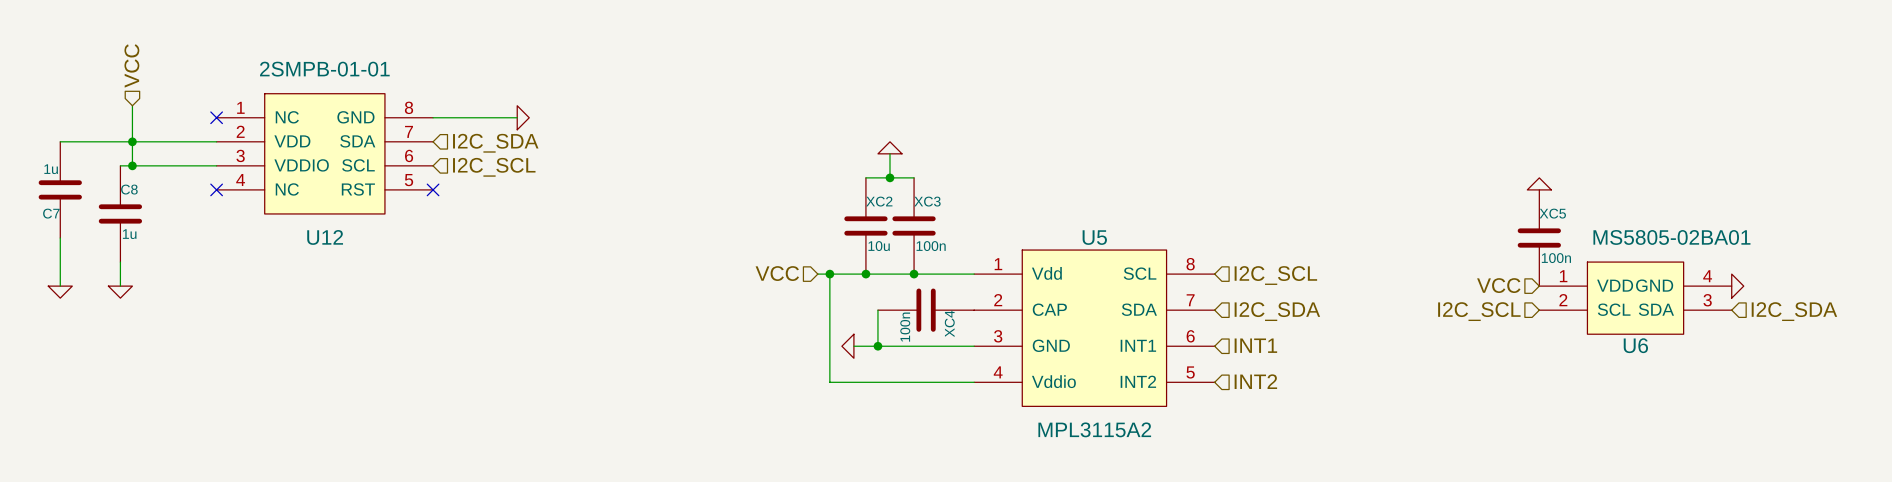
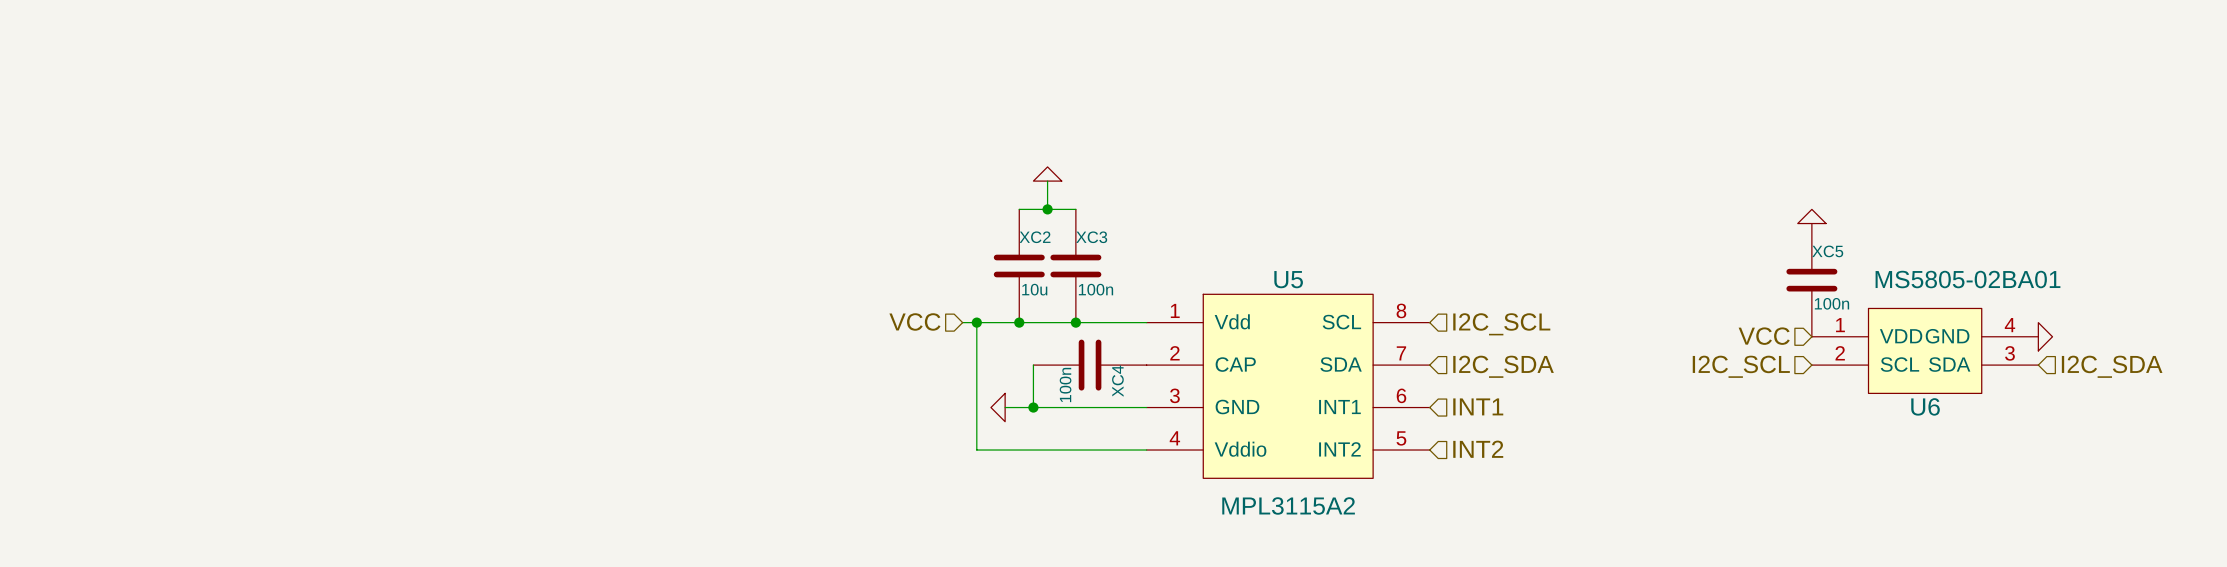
hierarchical label: VCC (131, 65) -> none
wire: (132, 105) (132, 165) -> none
no-connect mark: (216, 117) -> none
wire: (433, 117) (517, 117) -> none
power symbol: (523, 117) -> none
wire: (60, 141) (216, 141) -> none
junction: (132, 141) -> none
hierarchical label: I2C_SDA (495, 143) -> none
U12: 2SMPB-01-01 (324, 153) -> none
wire: (120, 165) (216, 165) -> none
junction: (132, 165) -> none
hierarchical label: I2C_SCL (494, 167) -> none
C7: 1u (60, 189) -> none
no-connect mark: (216, 189) -> none
no-connect mark: (433, 189) -> none
C8: 1u (120, 213) -> none
wire: (60, 238) (60, 286) -> none
wire: (120, 262) (120, 286) -> none
power symbol: (60, 292) -> none
power symbol: (120, 292) -> none

